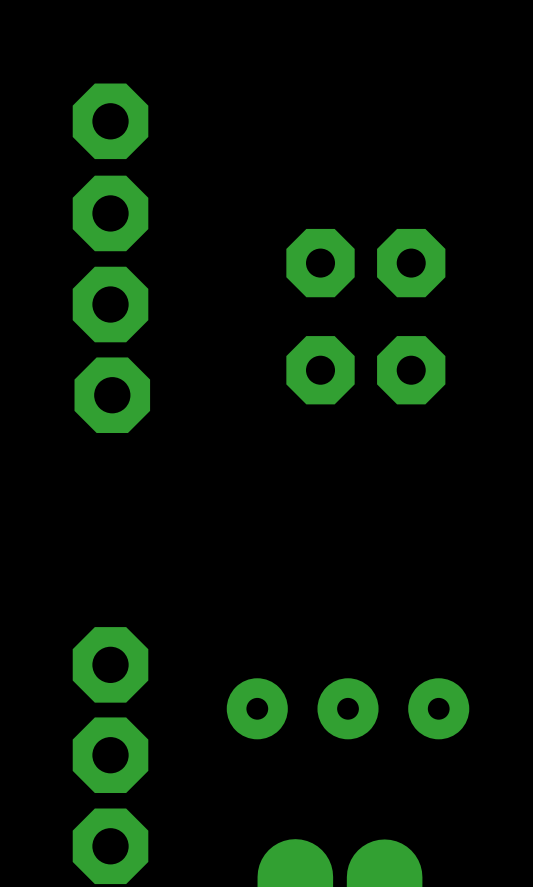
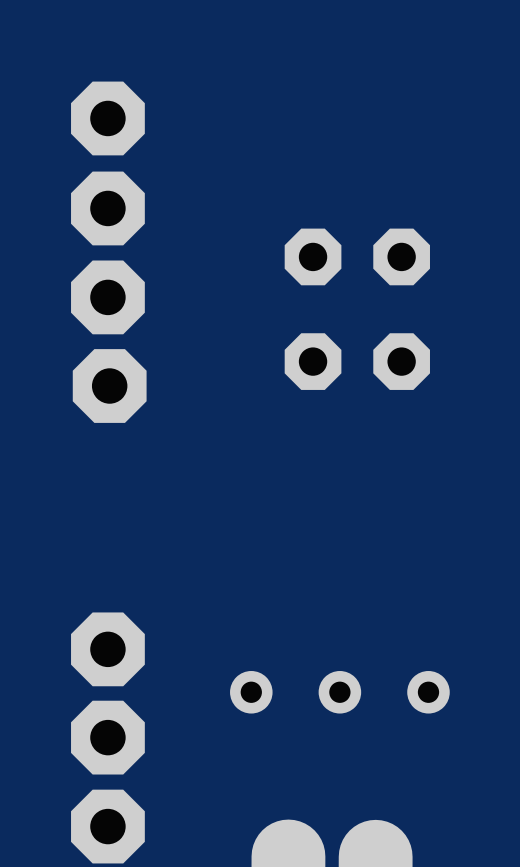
part footprint: [286, 228, 446, 298] -> [284, 228, 430, 286]
part footprint: [286, 336, 446, 405] -> [284, 333, 430, 390]
part footprint: [226, 678, 470, 740] -> [230, 671, 450, 714]

